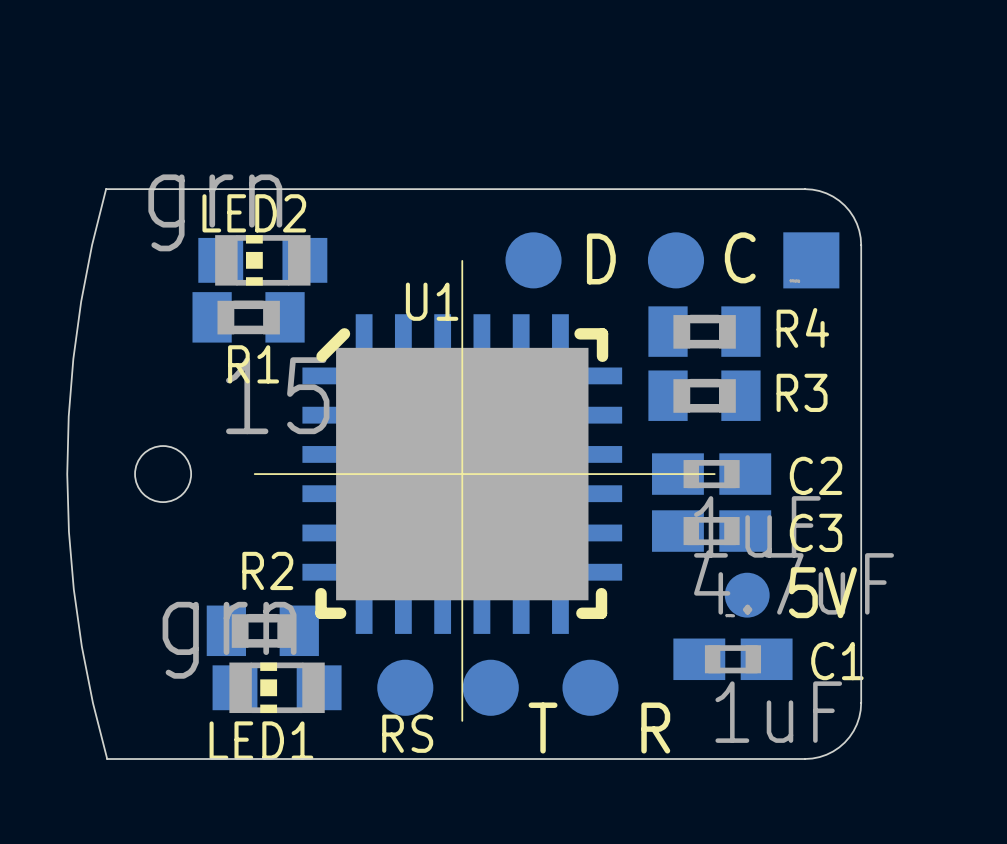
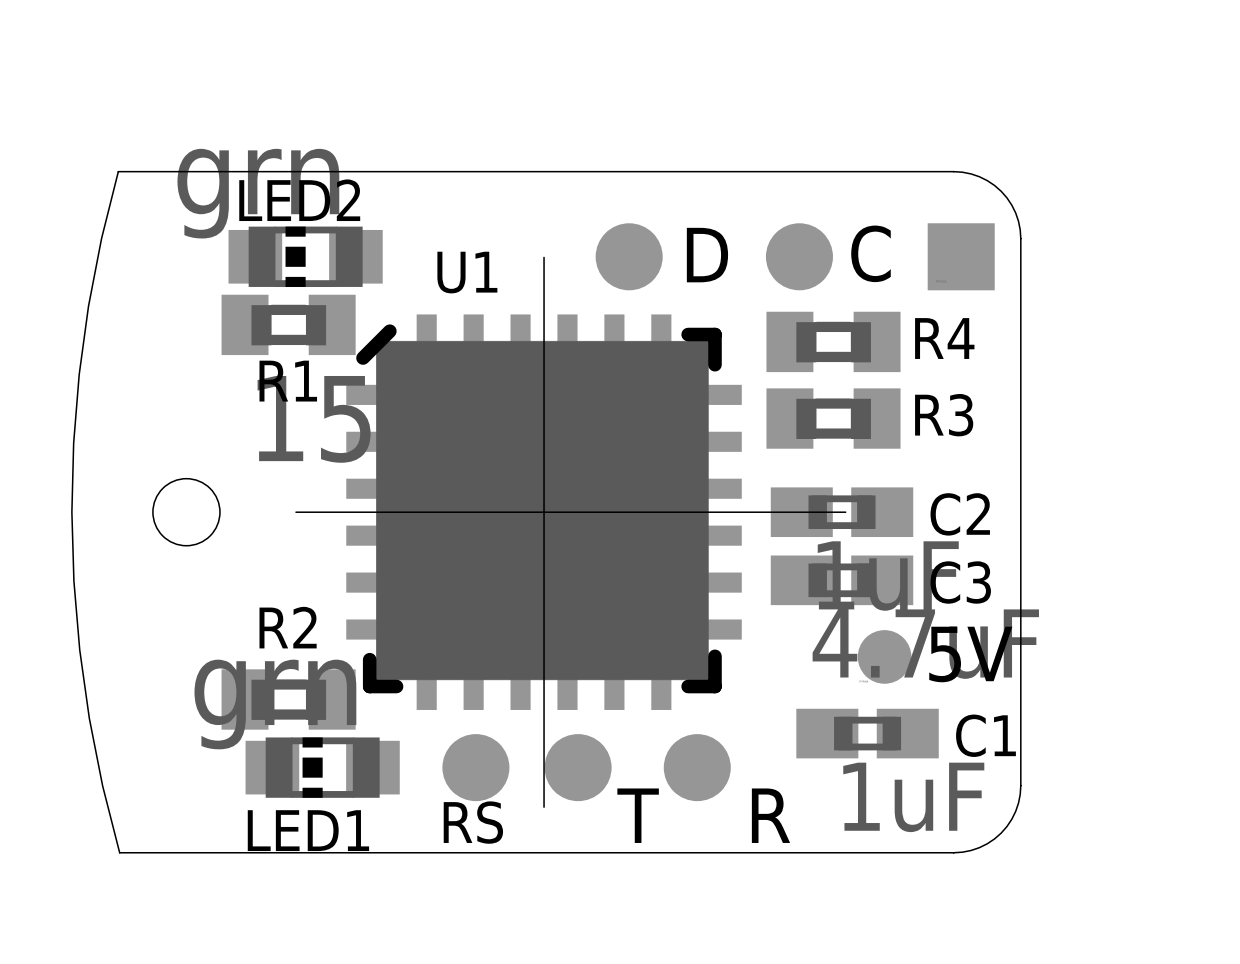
U1 footprint: [254, 260, 715, 721] -> [295, 257, 846, 808]
U1 name position: U1 (432, 301) -> U1 (467, 272)
R2 position: (262, 630) -> (288, 699)

